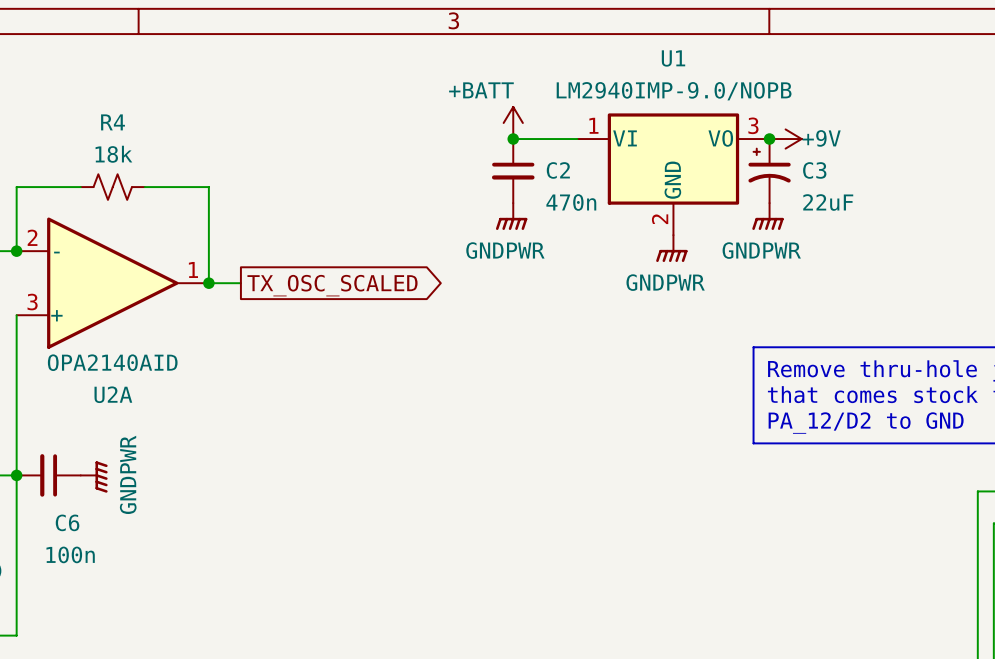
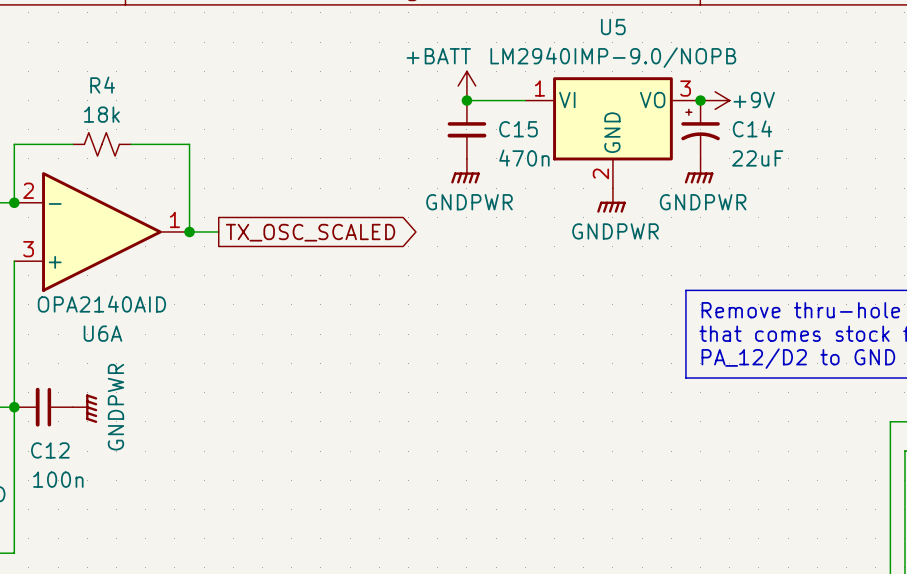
U1 name: U1 (673, 58) -> U5 (613, 27)
C2 name: C2 (558, 170) -> C15 (518, 129)
C3 name: C3 (814, 170) -> C14 (752, 128)
U2A name: U2A (113, 394) -> U6A (102, 333)
C6 name: C6 (67, 522) -> C12 (50, 450)

